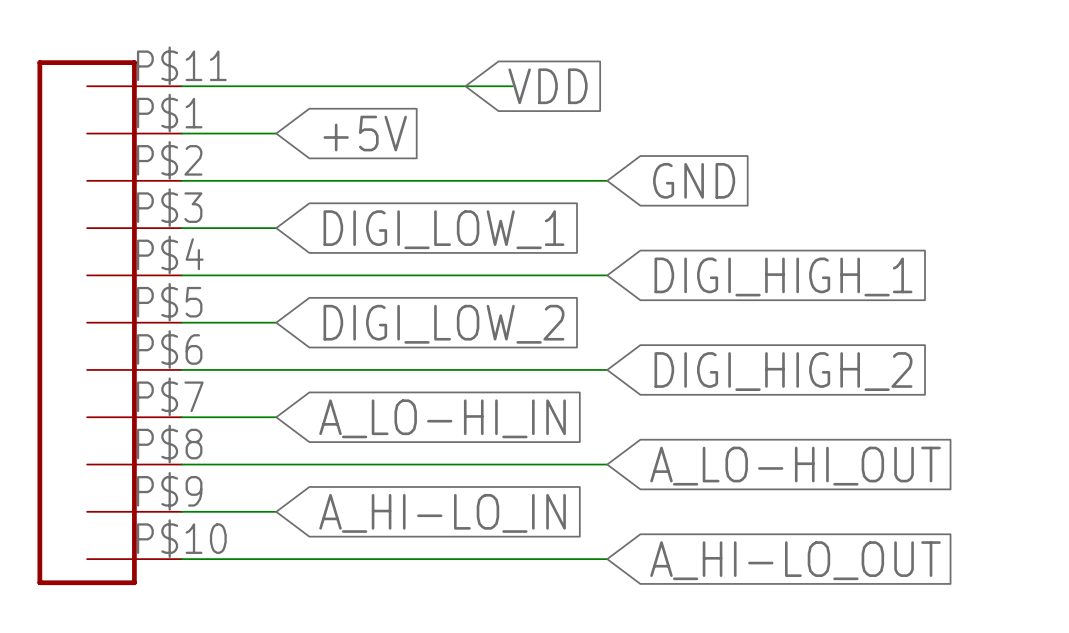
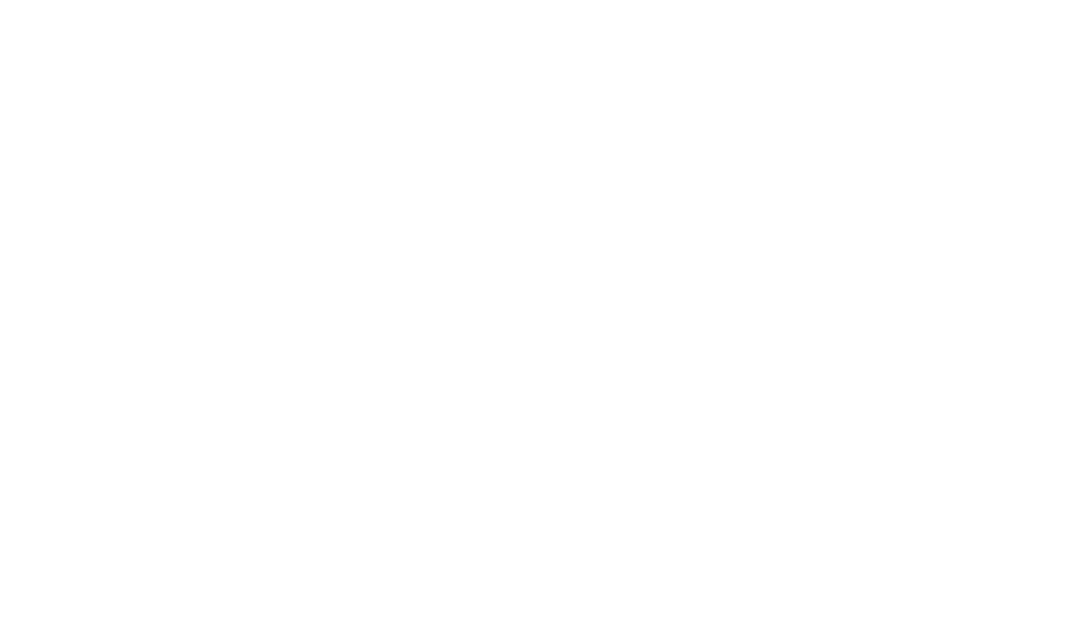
wire: (181, 86) (512, 86) -> none
global label: VDD (548, 86) -> none
wire: (181, 133) (276, 133) -> none
global label: +5V (365, 133) -> none
wire: (181, 180) (607, 180) -> none
global label: GND (694, 180) -> none
wire: (181, 228) (276, 228) -> none
global label: DIGI_LOW_1 (443, 229) -> none
wire: (181, 275) (607, 275) -> none
global label: DIGI_HIGH_1 (783, 276) -> none
part: (109, 322) -> none
wire: (181, 322) (276, 322) -> none
global label: DIGI_LOW_2 (443, 324) -> none
wire: (181, 369) (607, 369) -> none
global label: DIGI_HIGH_2 (783, 371) -> none
wire: (181, 417) (276, 417) -> none
global label: A_LO-HI_IN (442, 418) -> none
wire: (181, 464) (607, 464) -> none
global label: A_LO-HI_OUT (795, 466) -> none
wire: (181, 511) (276, 511) -> none
global label: A_HI-LO_IN (442, 513) -> none
wire: (181, 559) (607, 559) -> none
global label: A_HI-LO_OUT (795, 560) -> none

